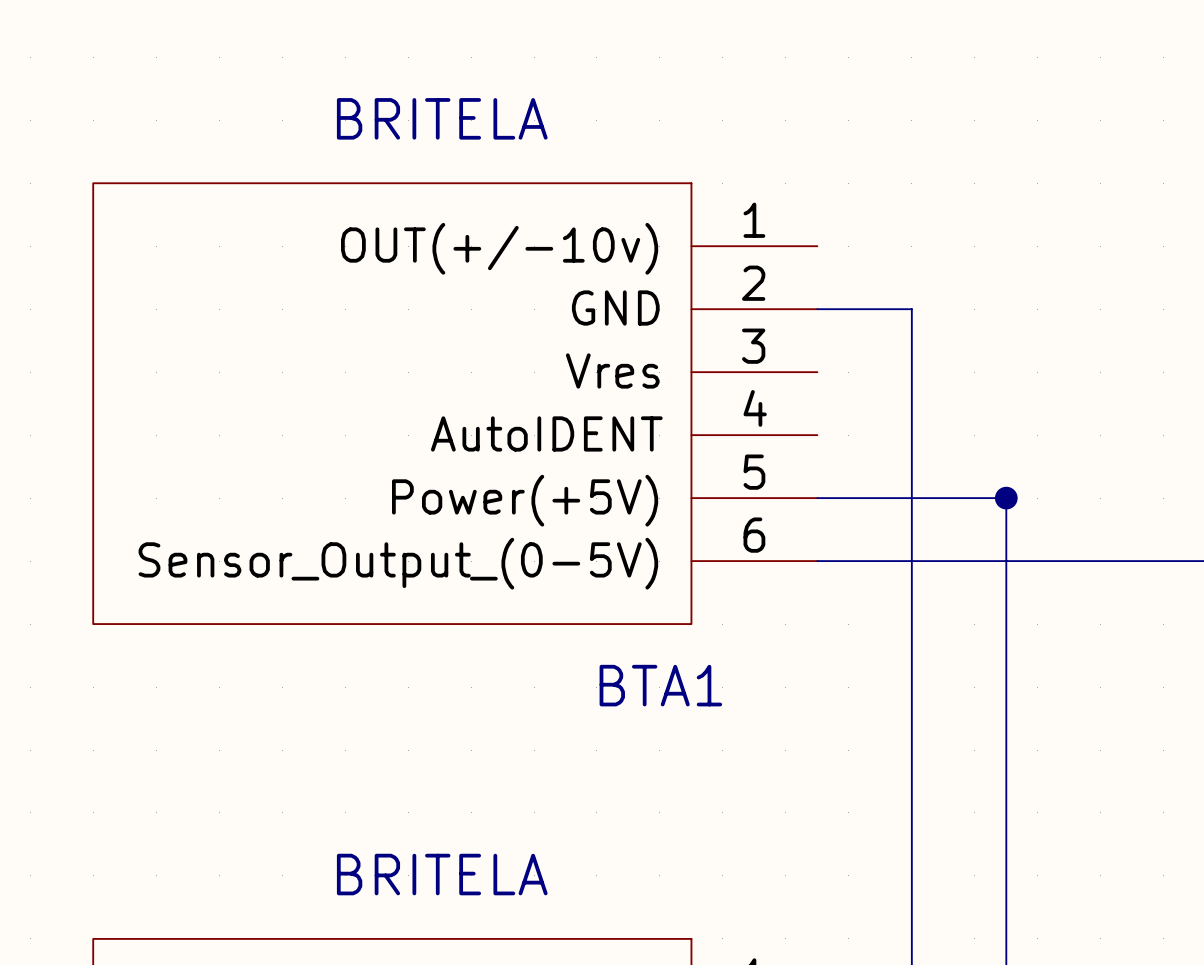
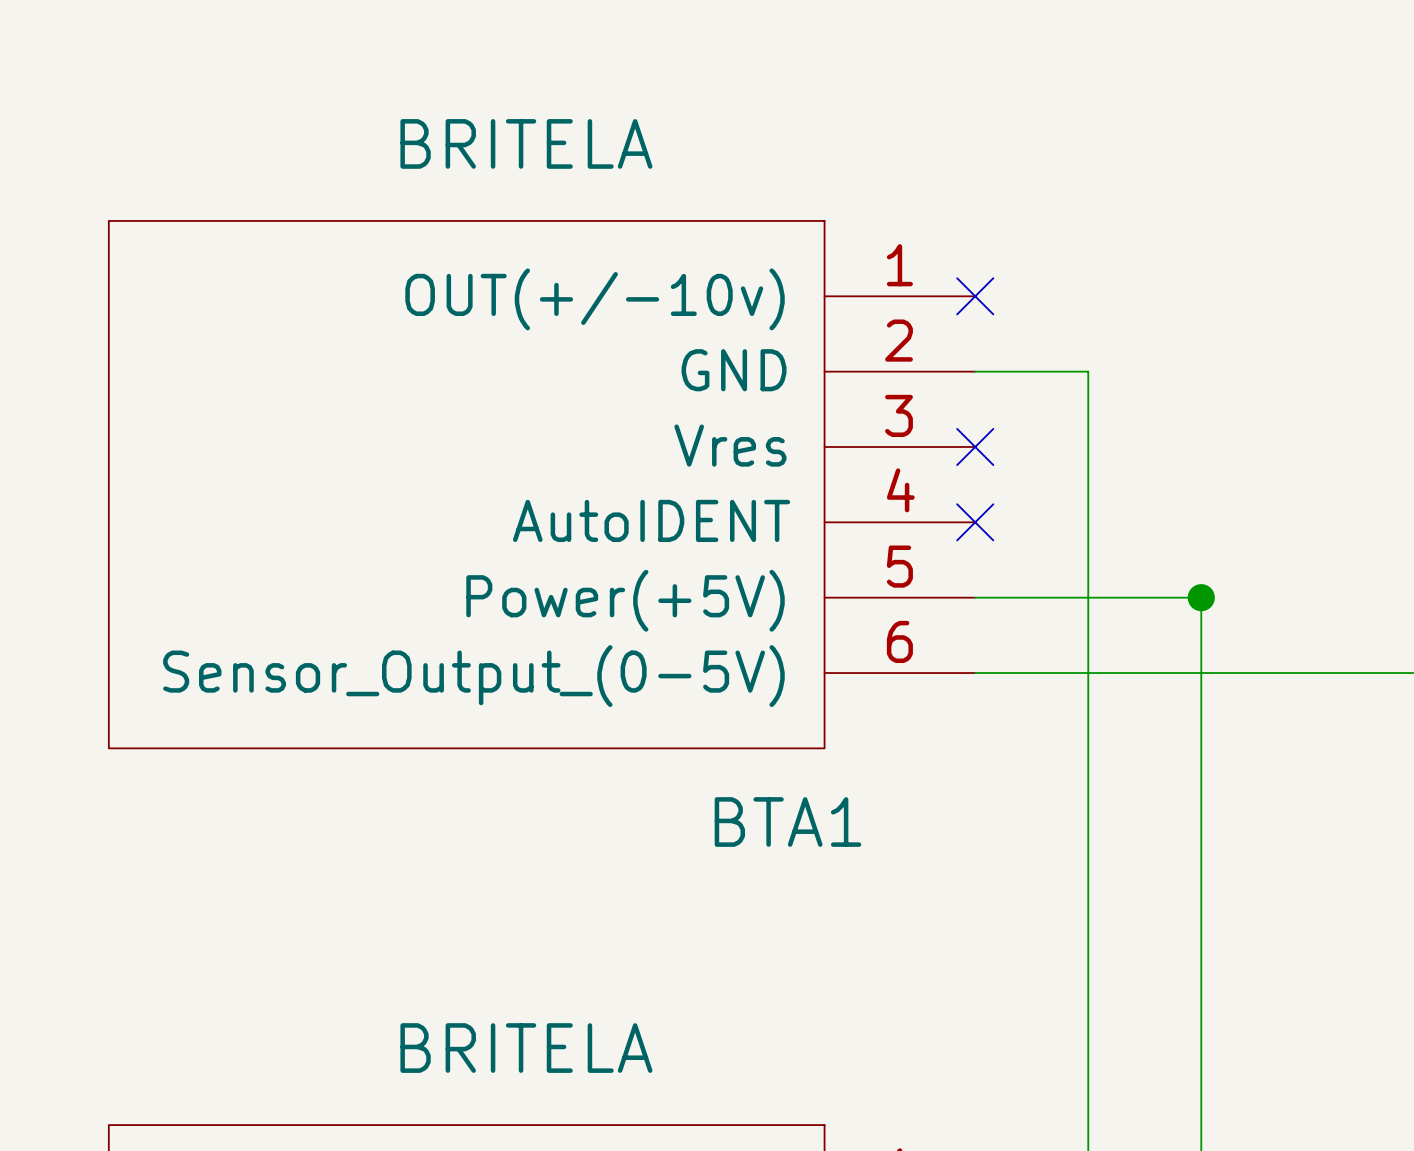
no-connect mark: none -> (975, 296)
no-connect mark: none -> (975, 446)
no-connect mark: none -> (975, 522)

